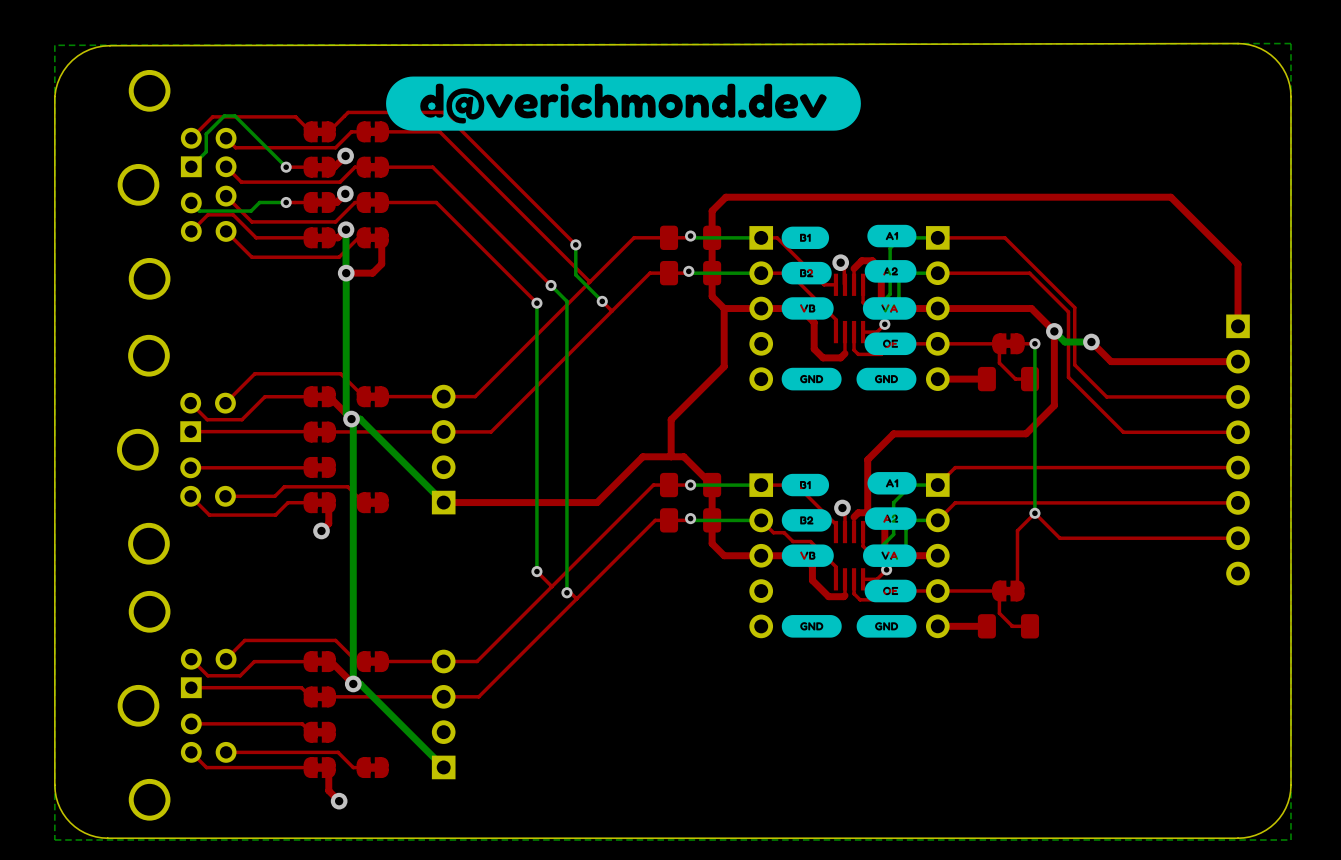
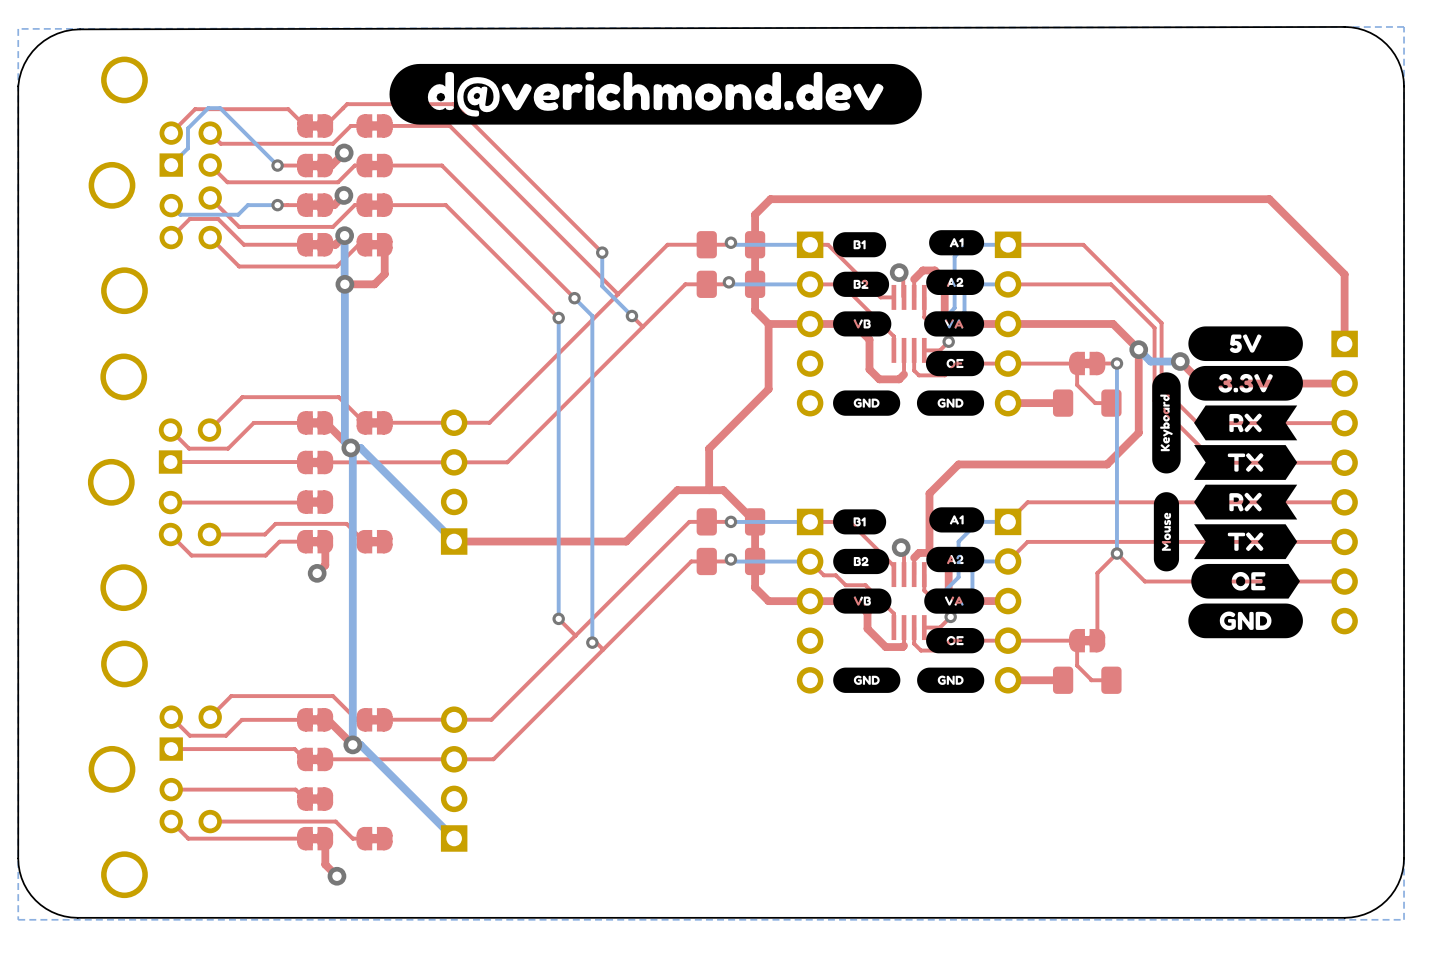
drawing: none -> [1152, 326, 1303, 639]

